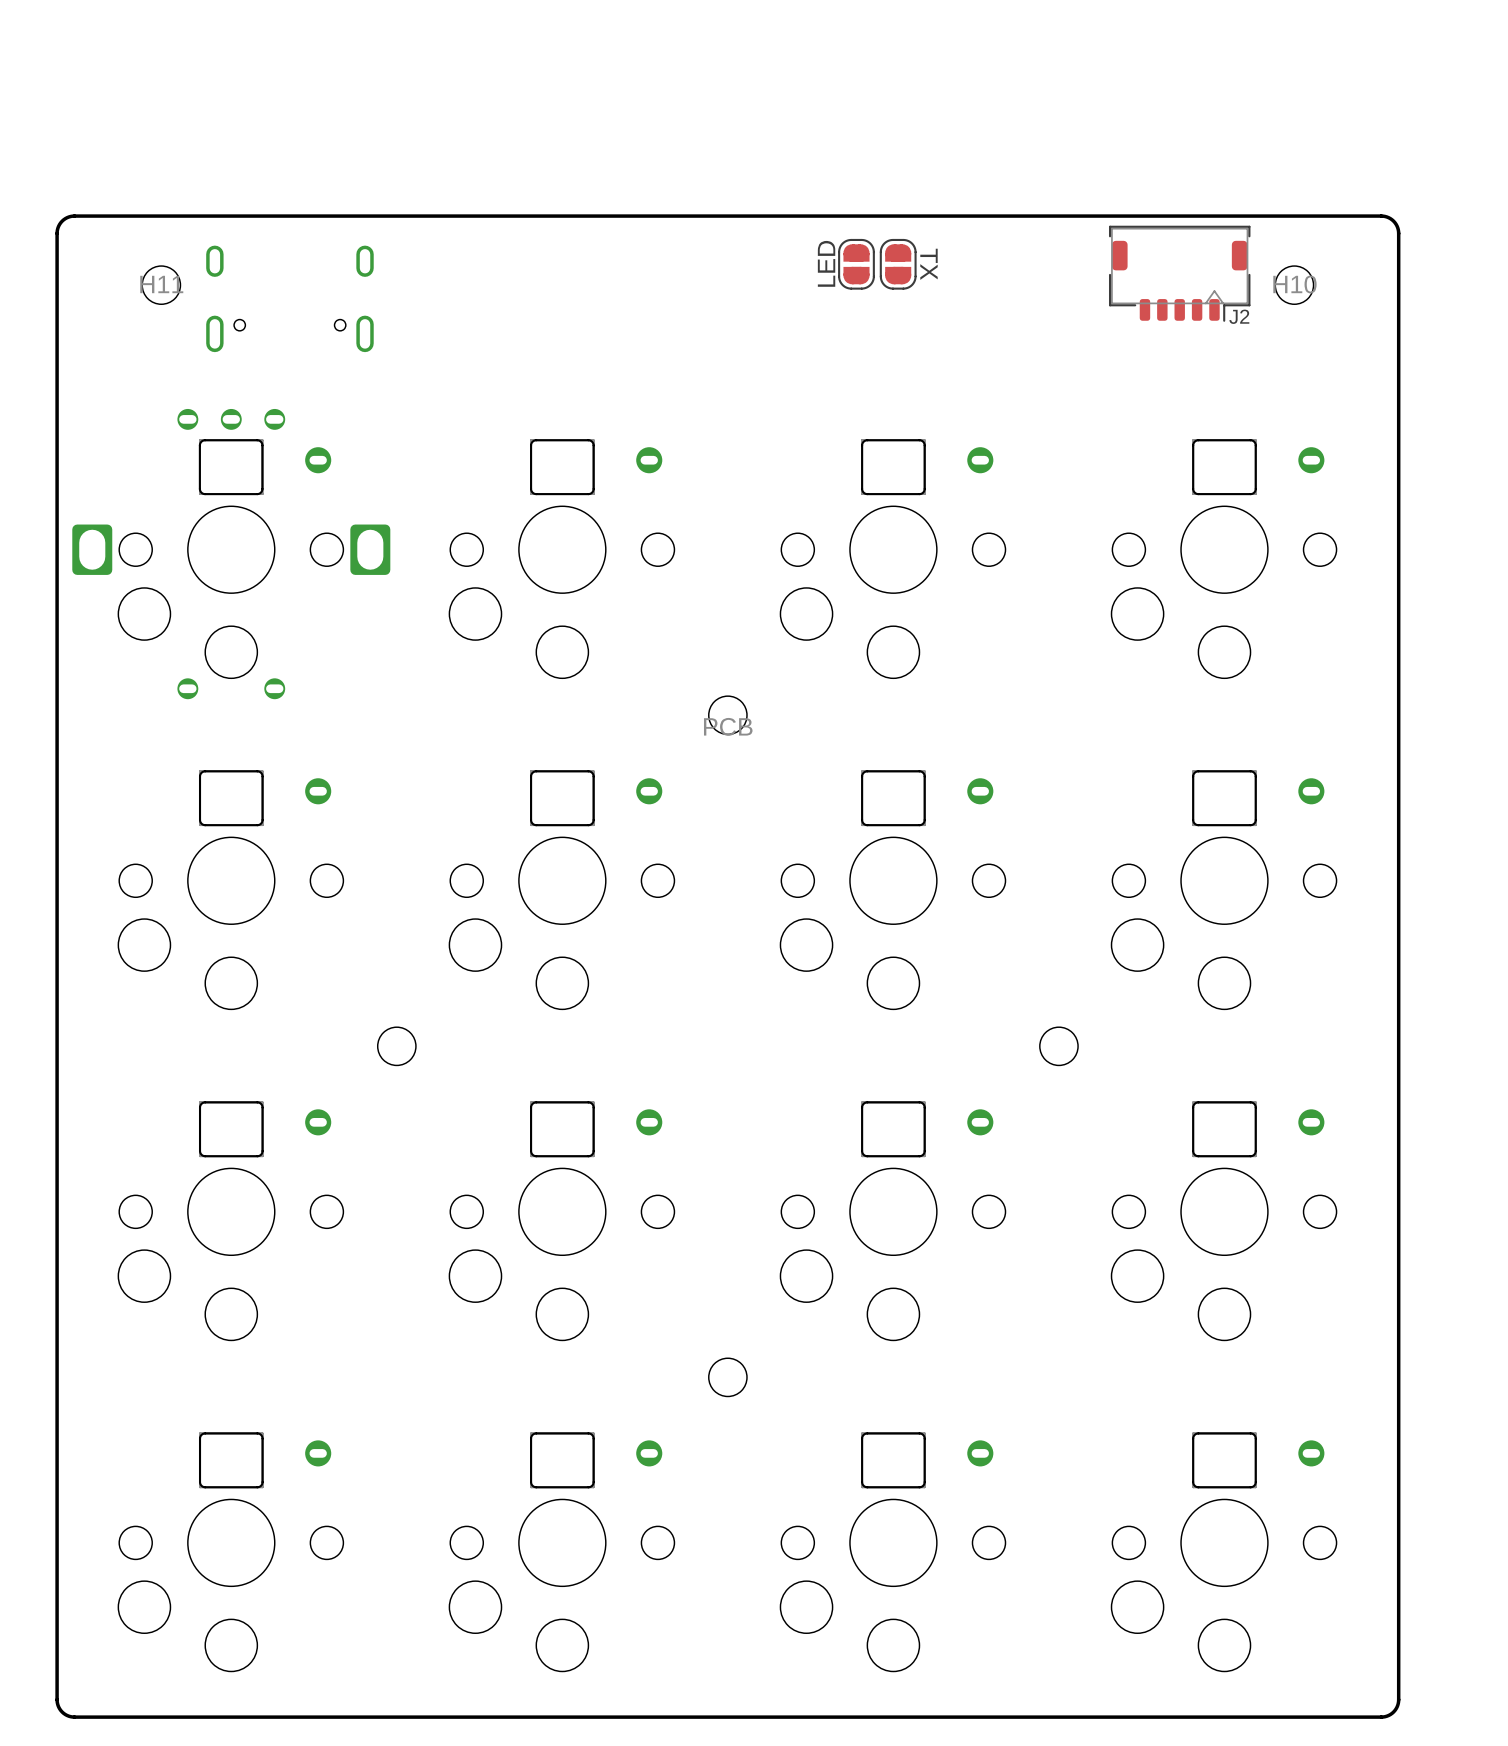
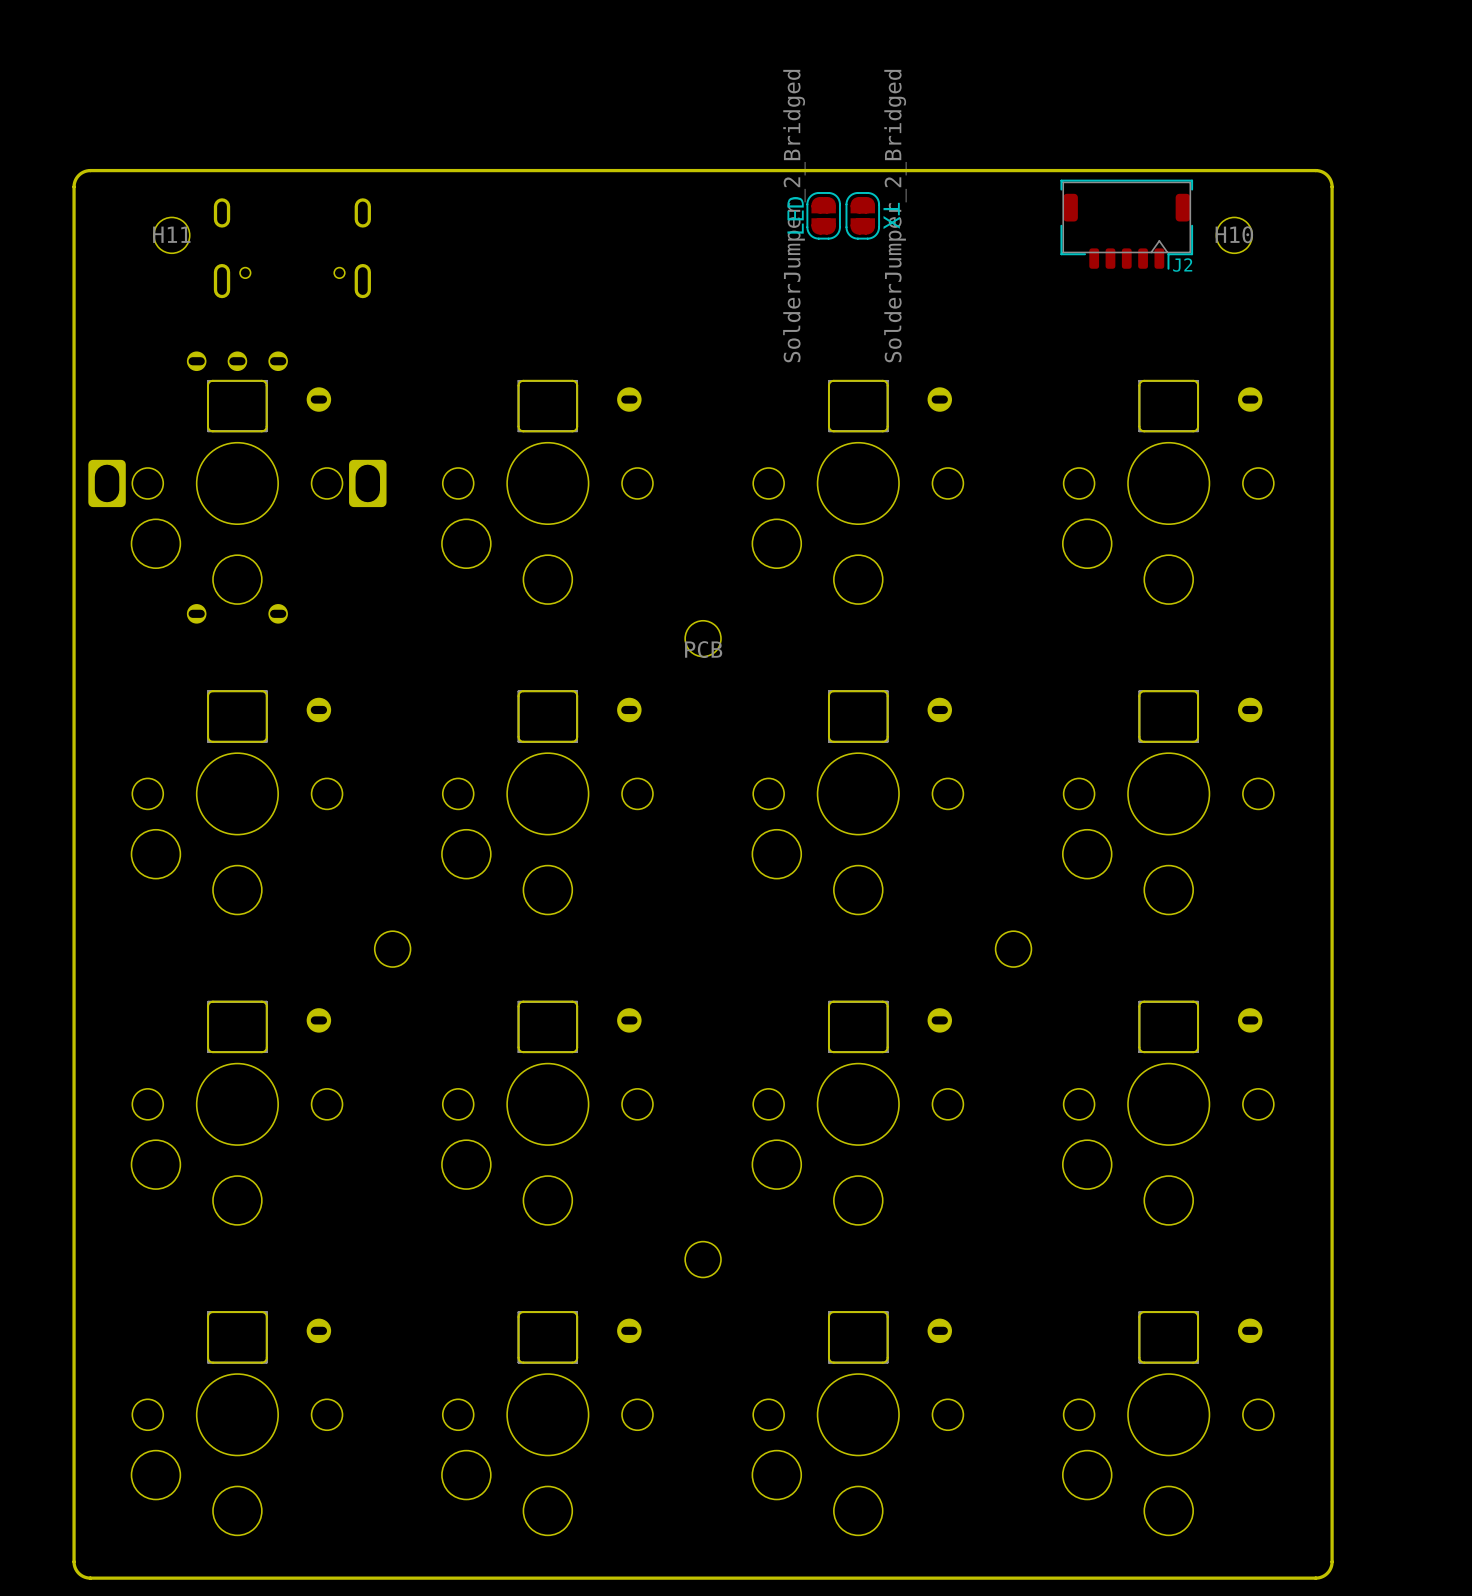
part value: none -> SolderJumper_2_Bridged (794, 216)
part value: none -> SolderJumper_2_Bridged (895, 216)

